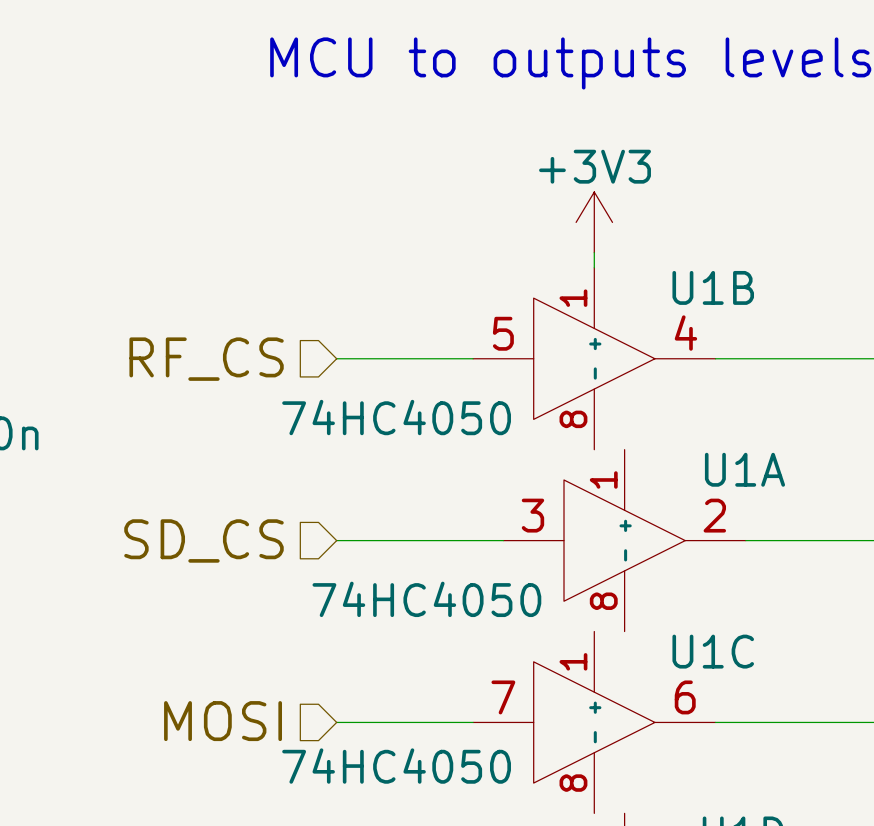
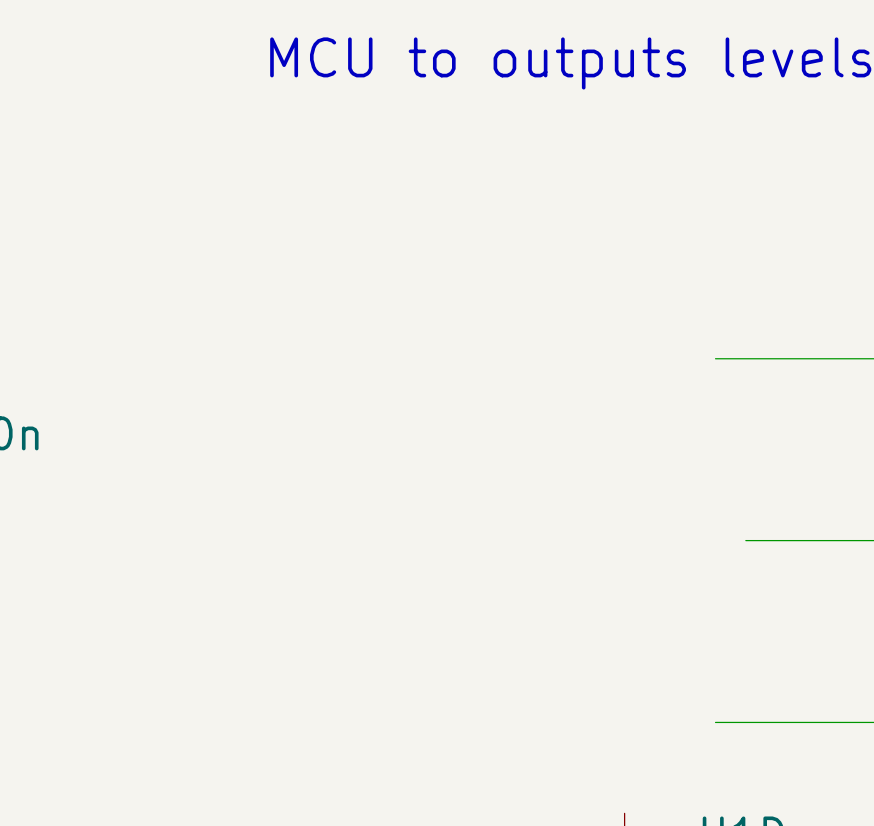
power symbol: +3V3 (594, 222) -> none
wire: (594, 252) (594, 267) -> none
wire: (336, 358) (473, 358) -> none
U1B: 74HC4050 (594, 358) -> none
hierarchical label: RF_CS (206, 359) -> none
hierarchical label: SD_CS (203, 540) -> none
wire: (336, 540) (503, 540) -> none
U1A: 74HC4050 (624, 540) -> none
hierarchical label: MOSI (223, 721) -> none
wire: (336, 722) (473, 722) -> none
U1C: 74HC4050 (594, 722) -> none

